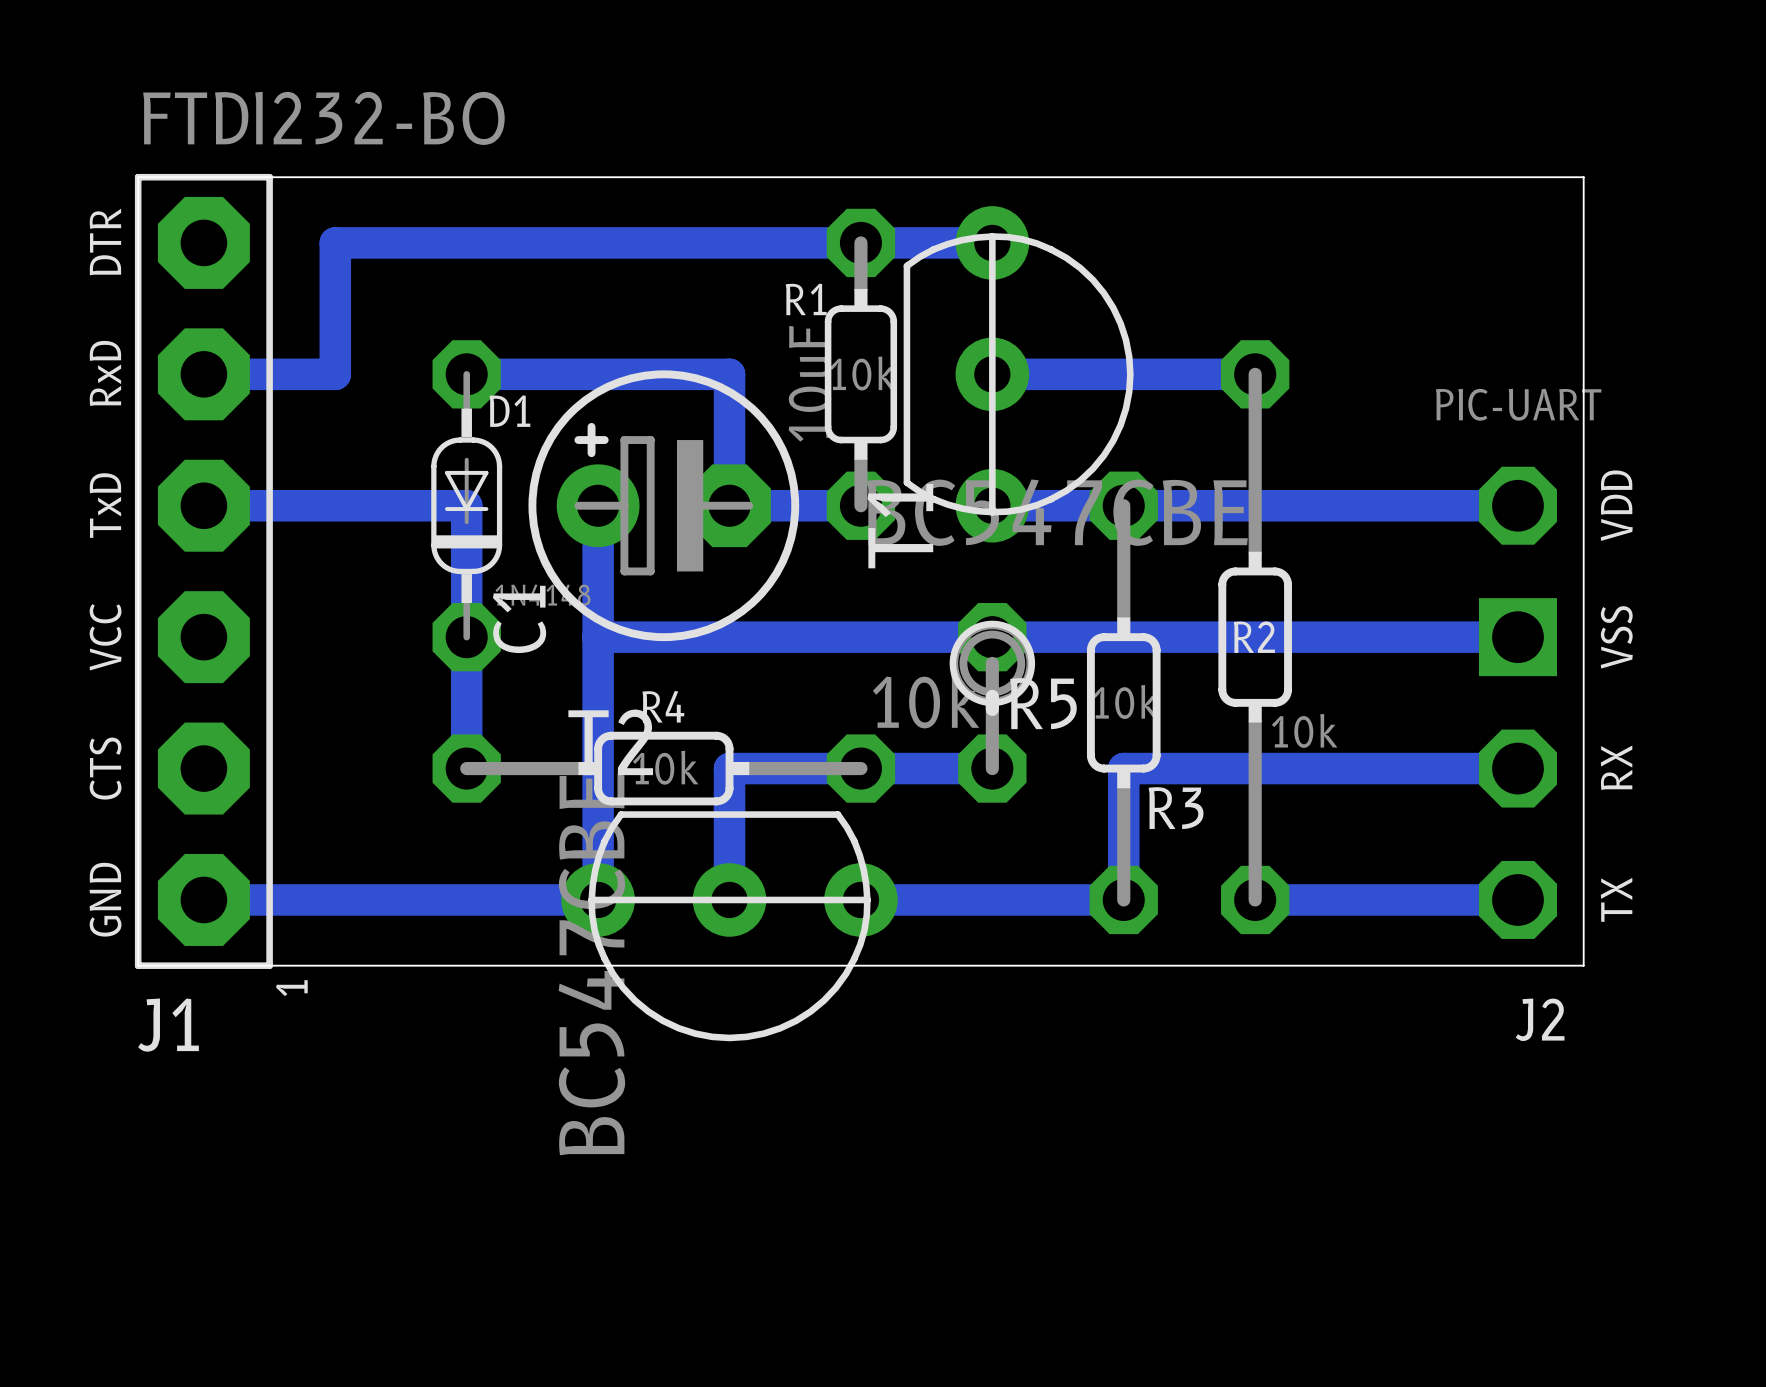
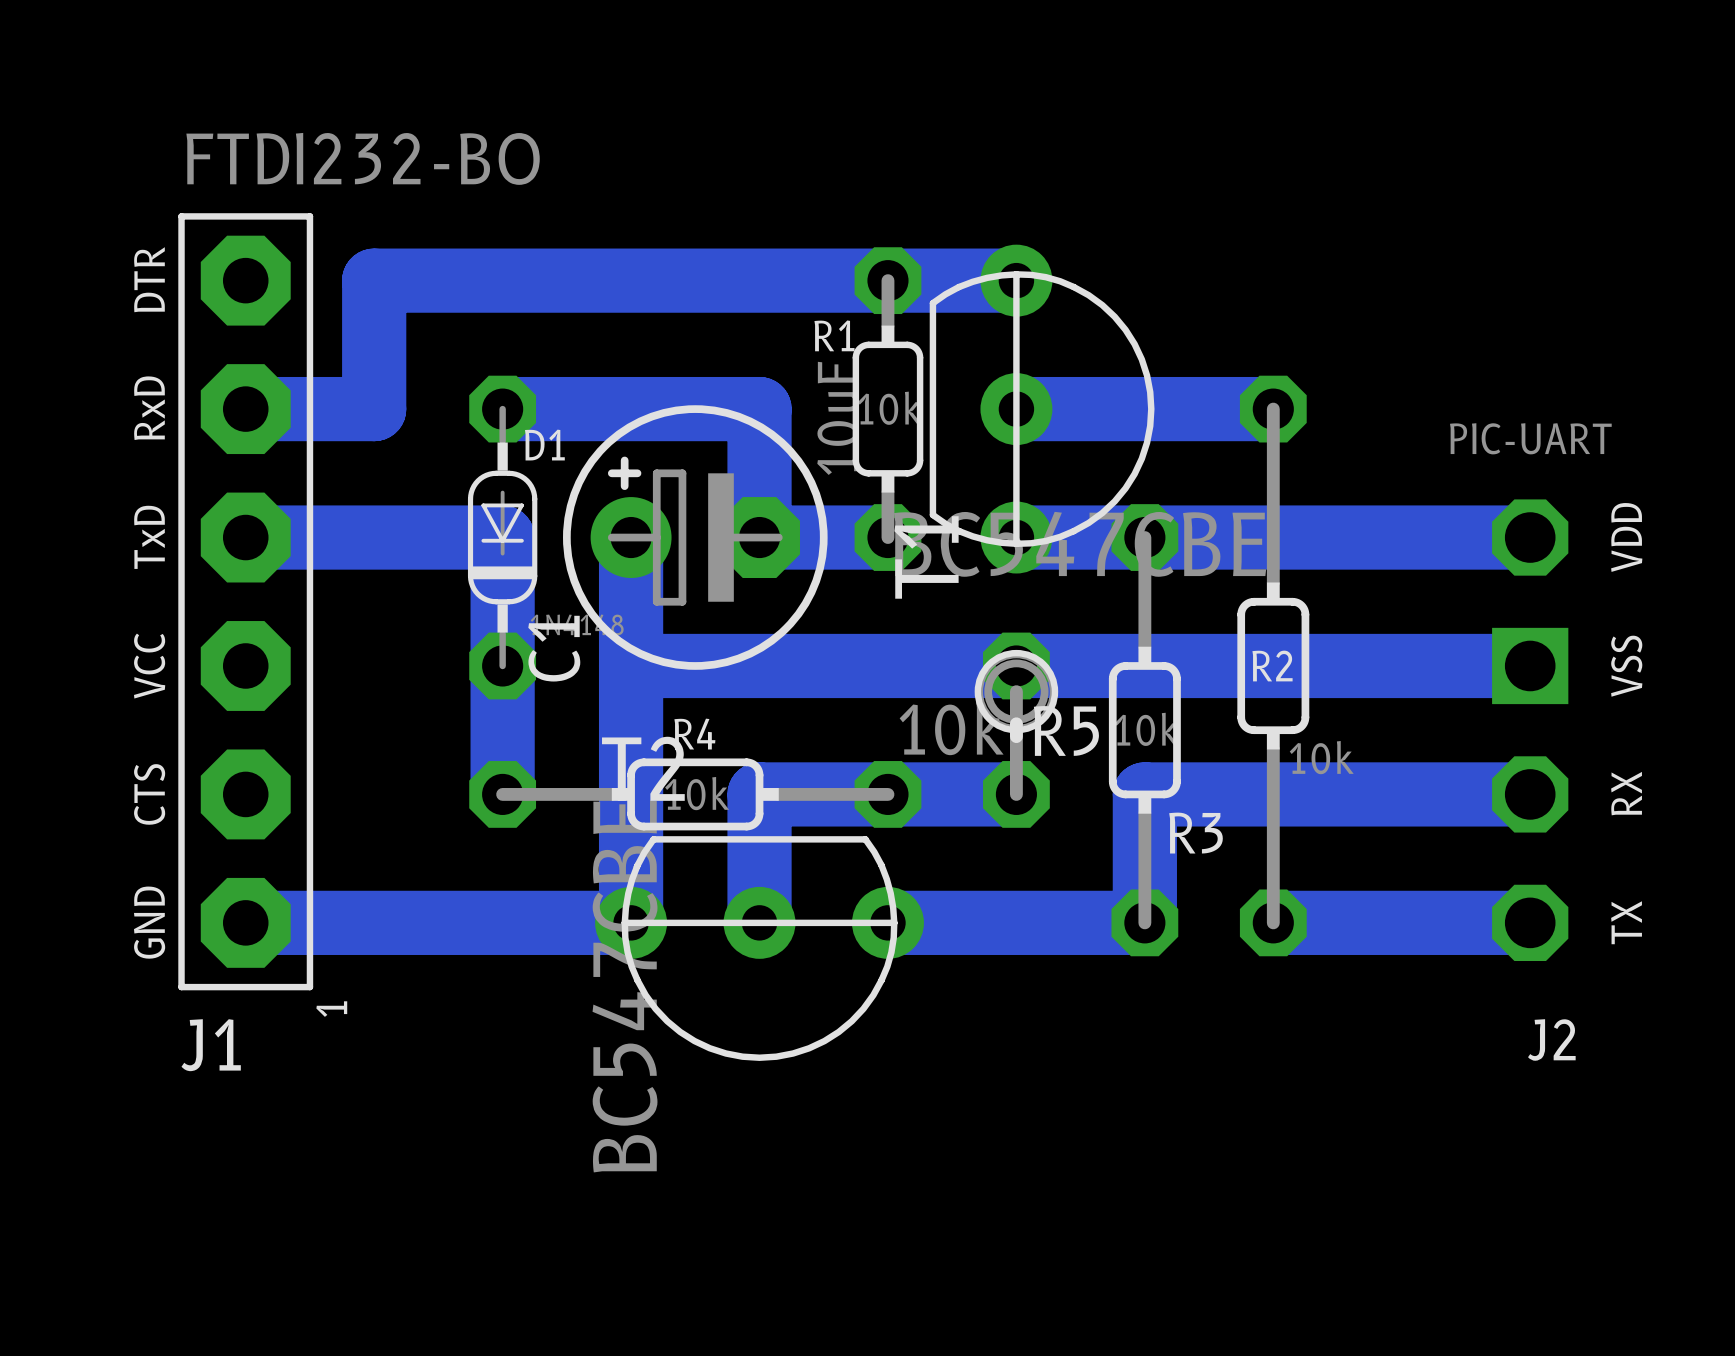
board edge: (138, 177) (1583, 177) (1583, 965) (138, 965) (138, 177) -> none
bottom track width: thin (992, 242) (335, 242) (335, 374) (203, 374) -> thick (1016, 280) (374, 280) (374, 409) (245, 409)
bottom track width: thin (466, 374) (729, 374) (729, 505) (860, 505) -> thick (502, 409) (759, 409) (759, 537) (887, 537)
bottom track width: thin (992, 374) (1255, 374) -> thick (1016, 409) (1273, 409)
bottom track width: thin (203, 505) (466, 505) (466, 768) -> thick (245, 537) (502, 537) (502, 794)
bottom track width: thin (598, 505) (598, 899) (203, 899) -> thick (631, 537) (631, 922) (245, 922)
bottom track width: thin (992, 505) (1517, 505) -> thick (1016, 537) (1530, 537)
bottom track width: thin (598, 637) (1517, 637) -> thick (631, 665) (1530, 665)
bottom track width: thin (992, 768) (729, 768) (729, 899) -> thick (1016, 794) (759, 794) (759, 922)
bottom track width: thin (1517, 768) (1123, 768) (1123, 899) (860, 899) -> thick (1530, 794) (1144, 794) (1144, 922) (887, 922)
bottom track width: thin (1255, 899) (1517, 899) -> thick (1273, 922) (1530, 922)

